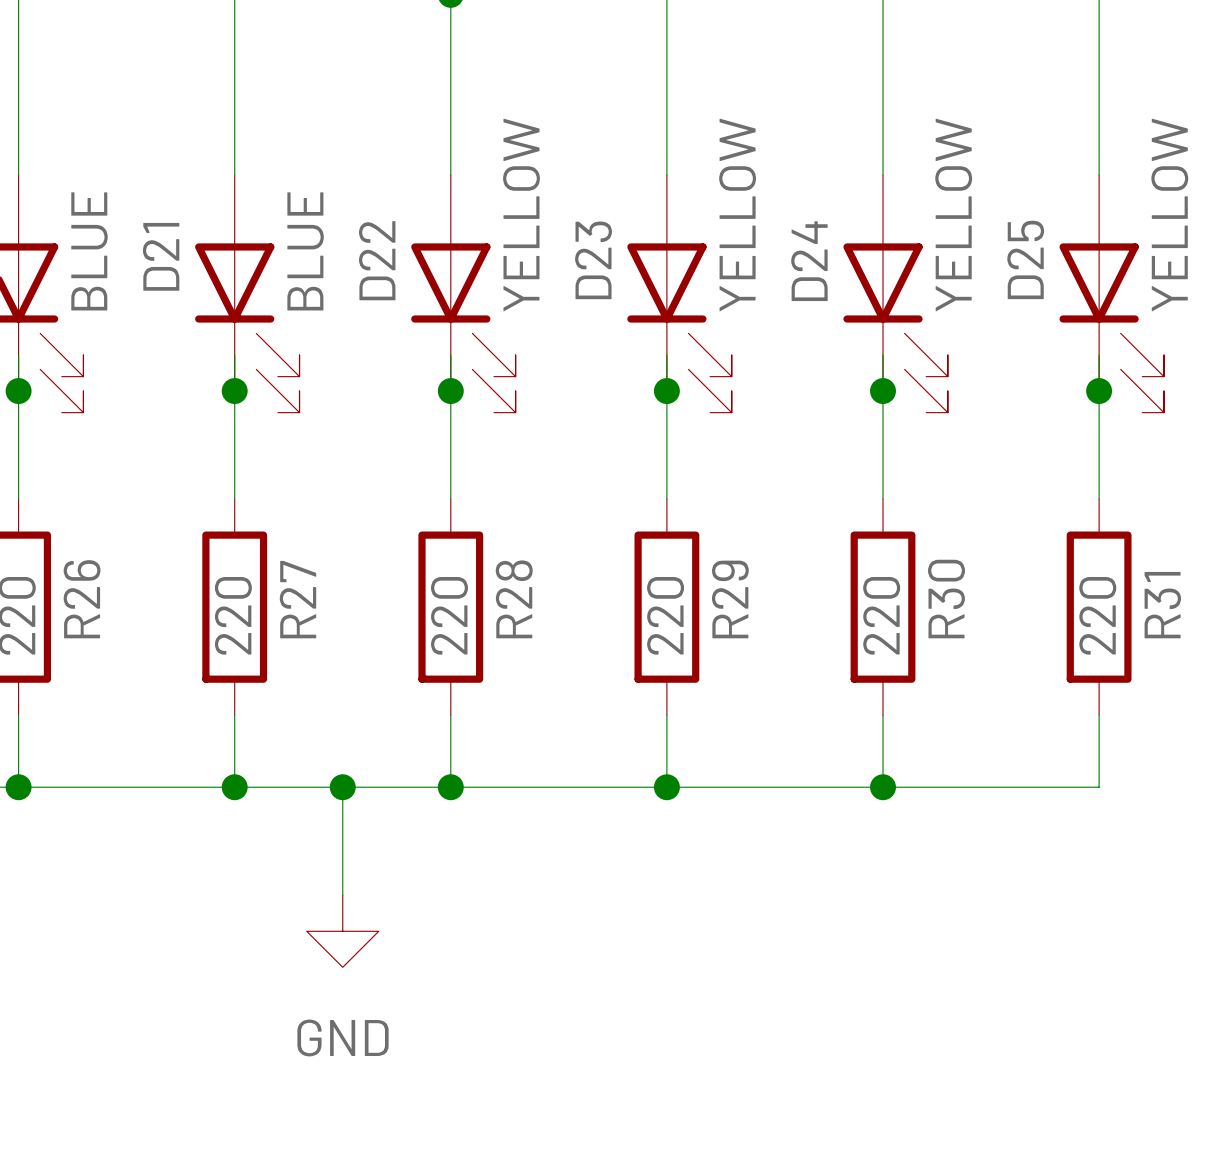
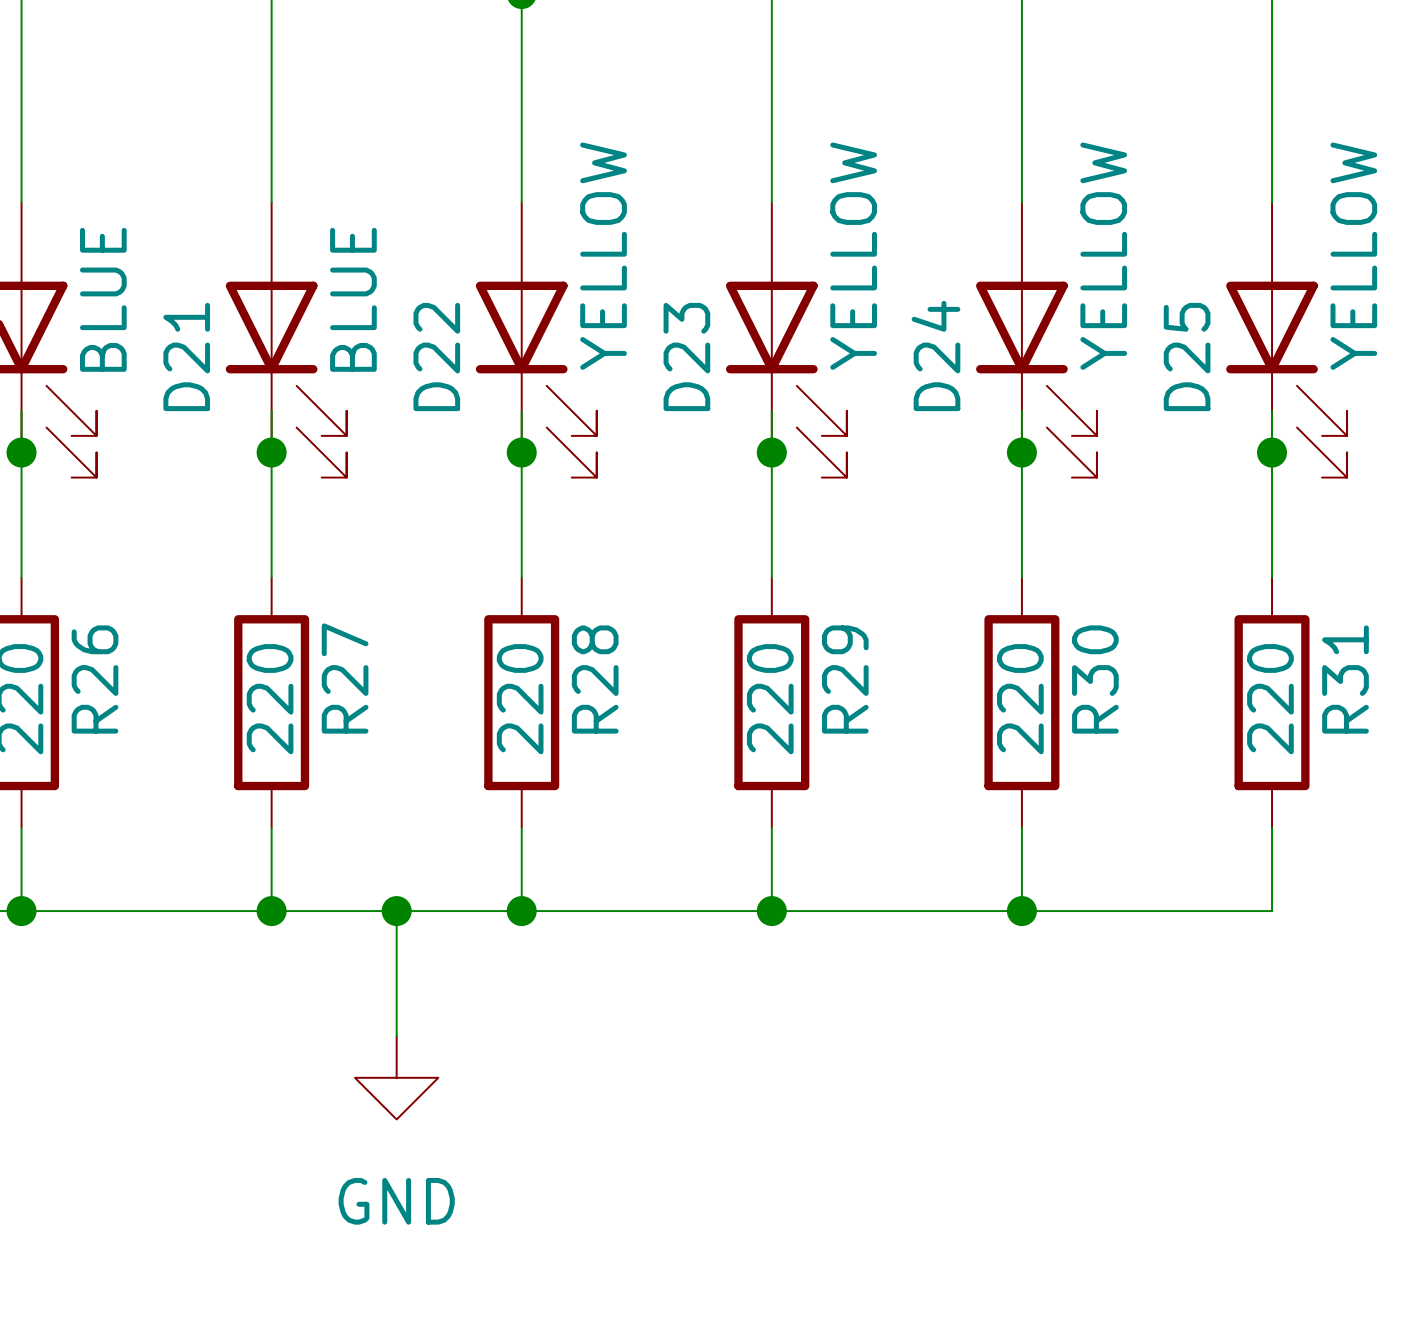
D21 name position: D21 (161, 256) -> D21 (186, 357)
D25 name position: D25 (1025, 259) -> D25 (1187, 357)
D22 name position: D22 (377, 260) -> D22 (436, 357)
D23 name position: D23 (593, 260) -> D23 (686, 357)
D24 name position: D24 (809, 261) -> D24 (936, 356)

